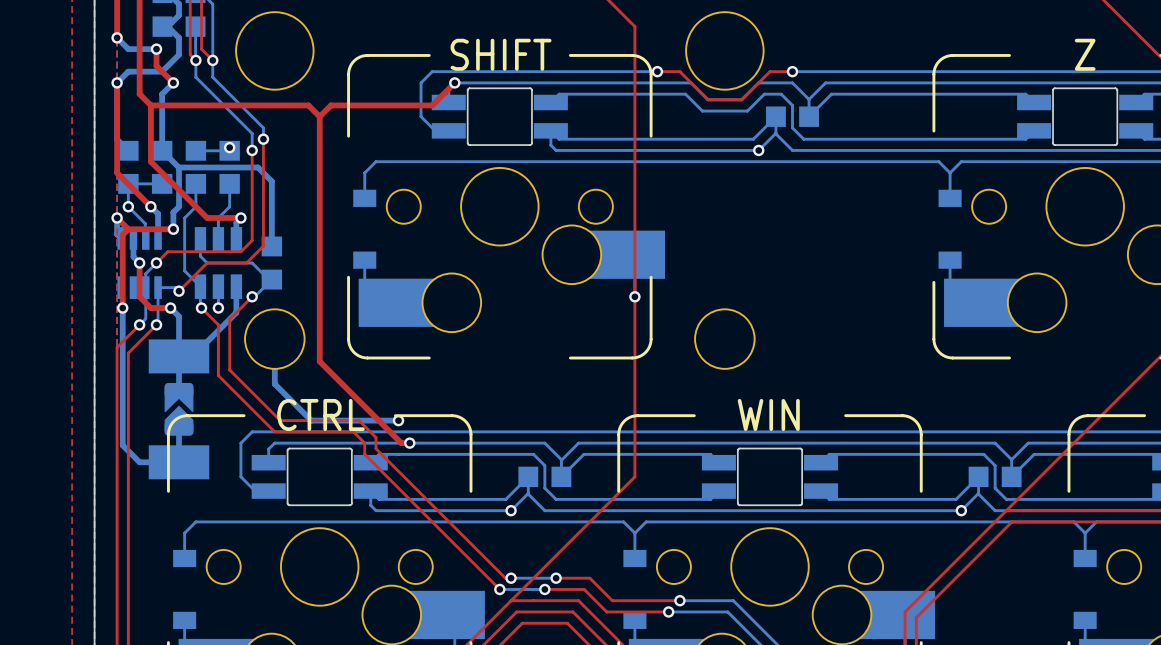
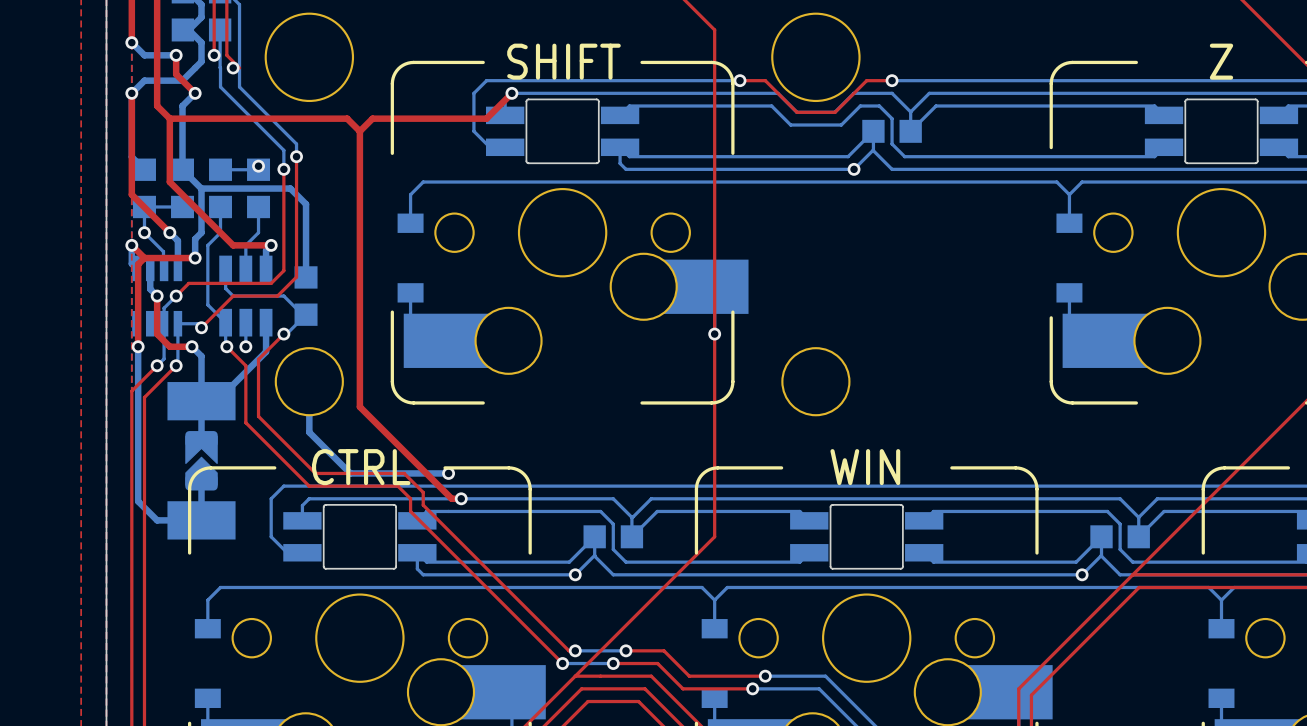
top track: (190, 49) (190, 54) (195, 60) -> none
via: none -> (214, 55)
via: (195, 60) -> none
via: none -> (233, 67)
via: (212, 60) -> none

